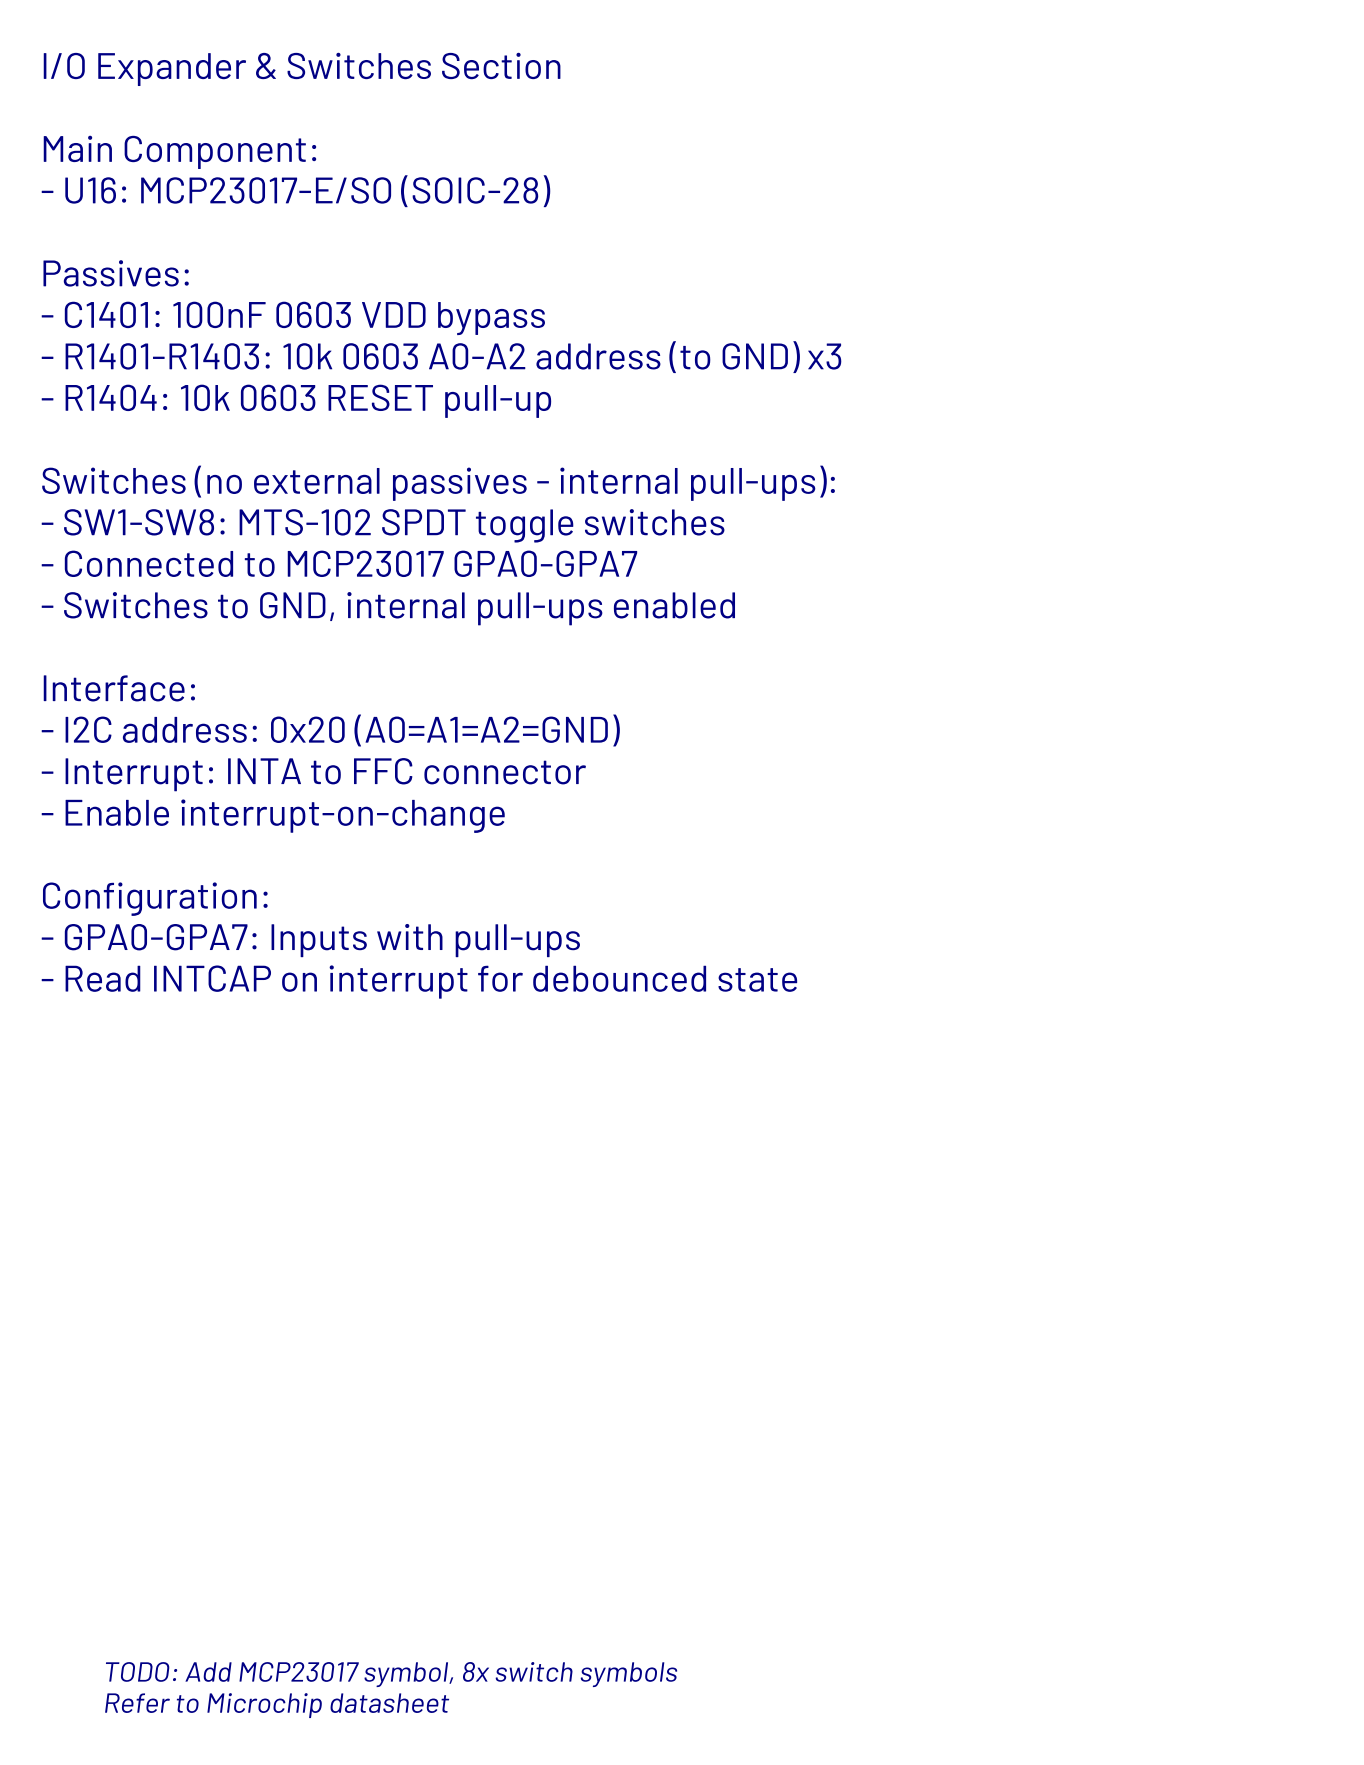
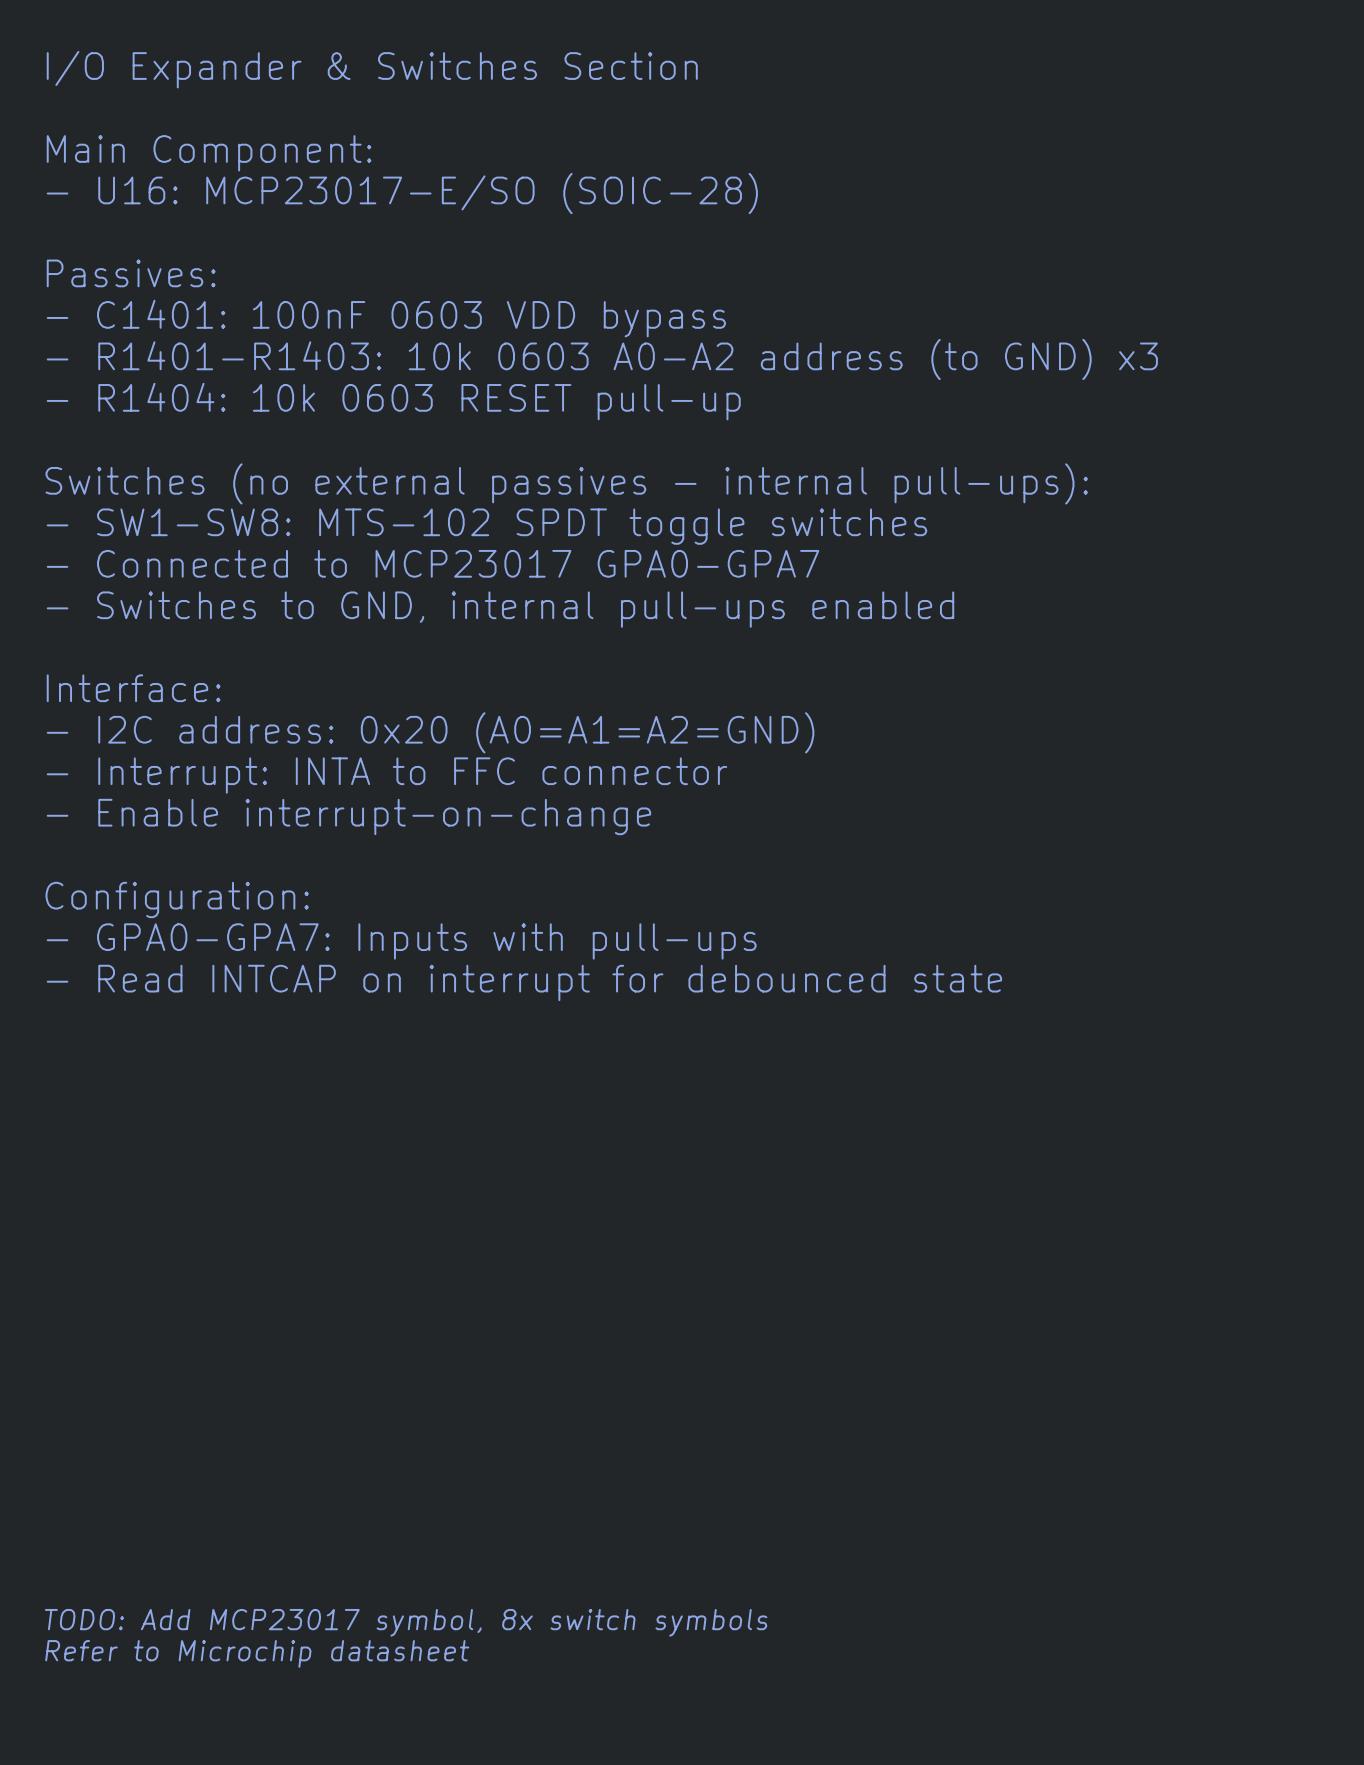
text position: TODO: Add MCP23017 symbol, 8x switch symbols (391, 1674) -> TODO: Add MCP23017 symbol, 8x switch symbols (406, 1622)
text position: Refer to Microchip datasheet (277, 1705) -> Refer to Microchip datasheet (257, 1653)

